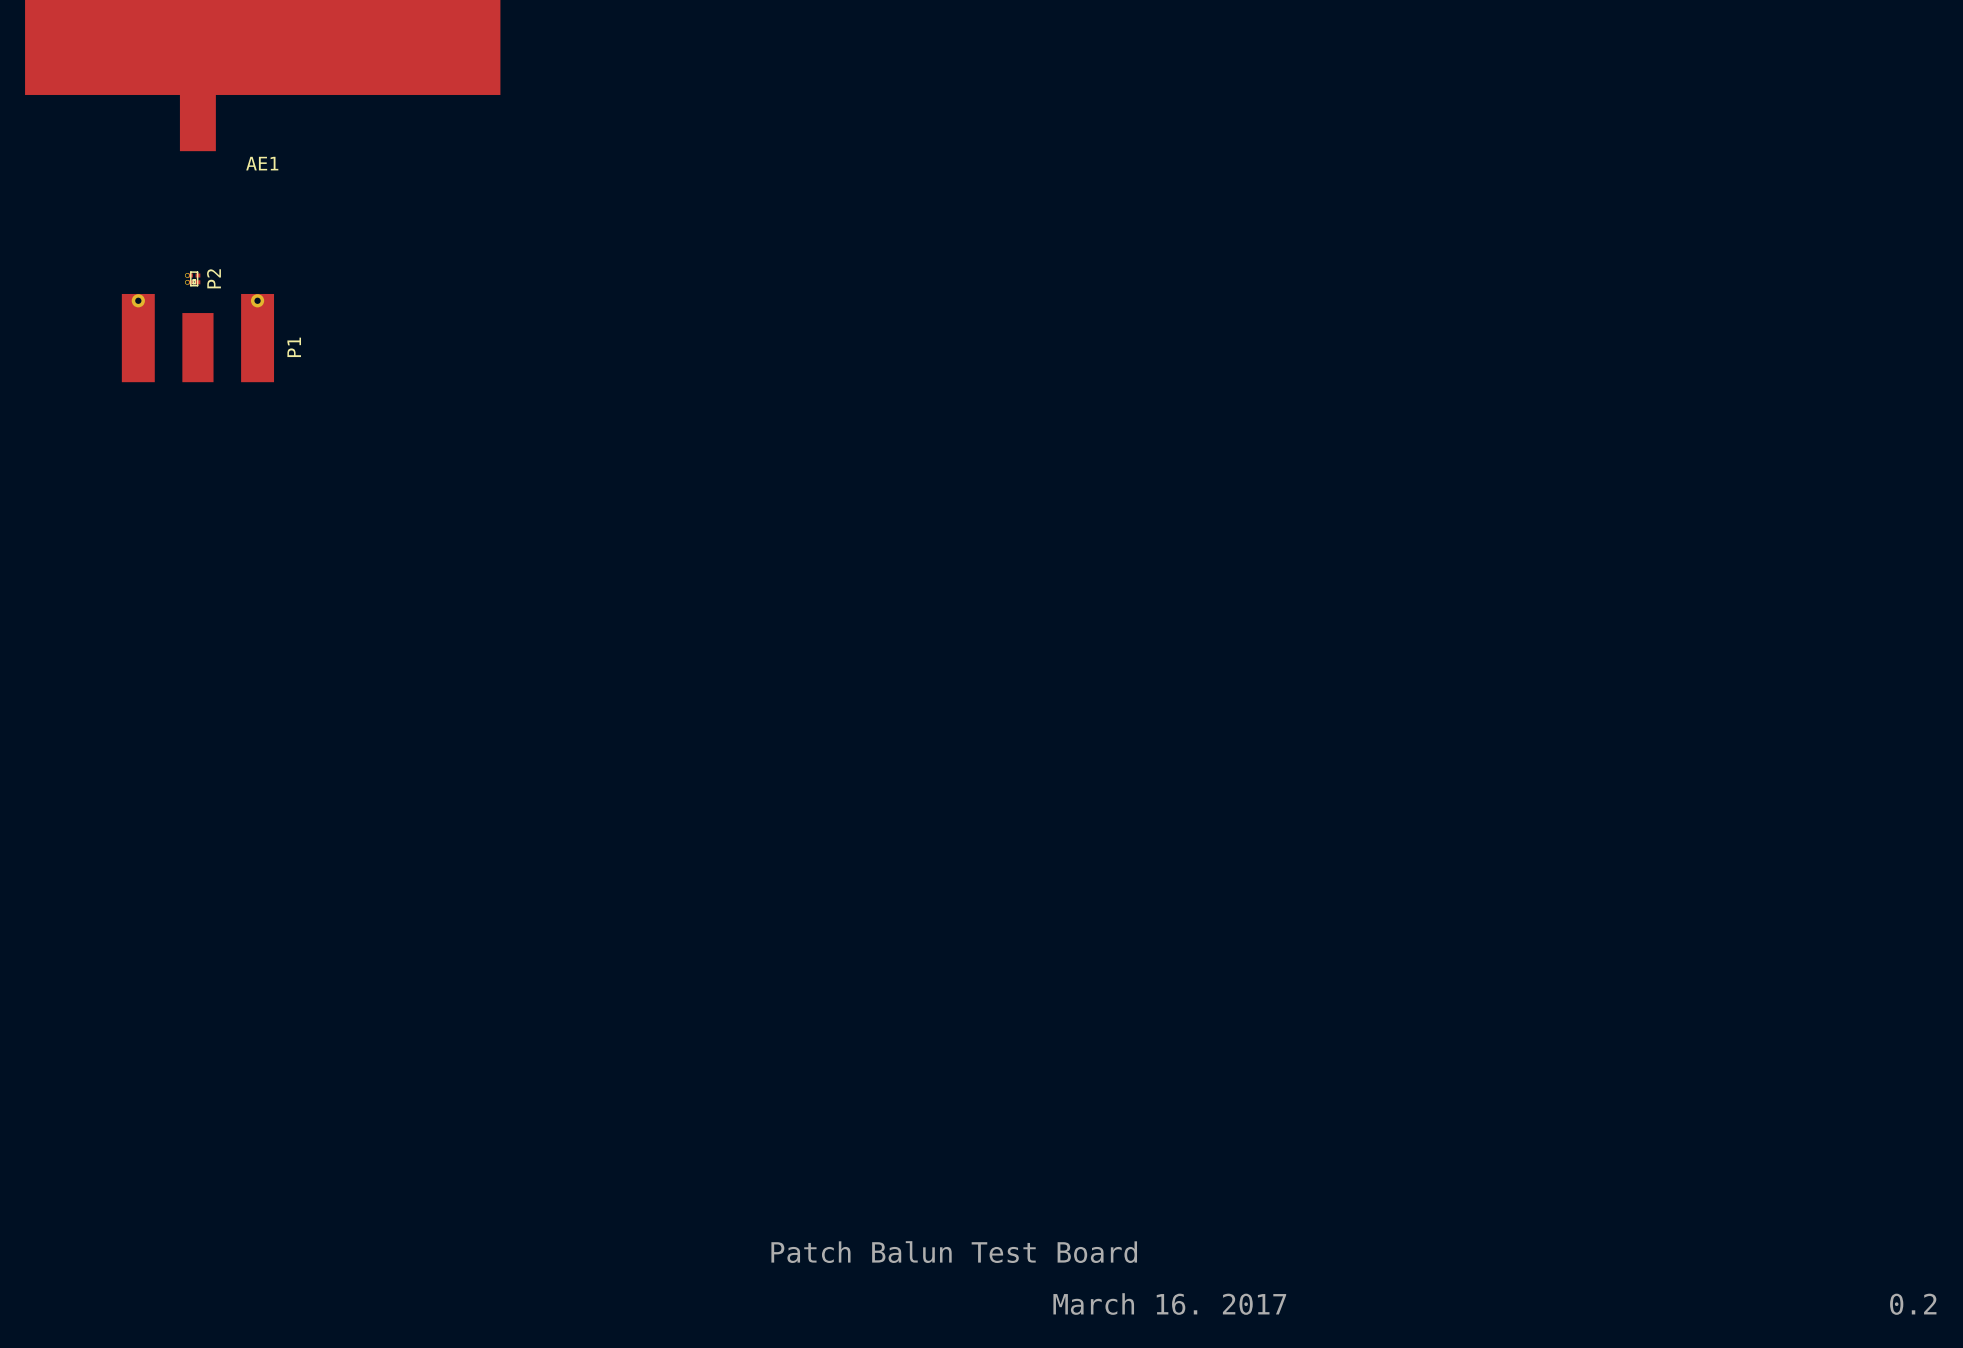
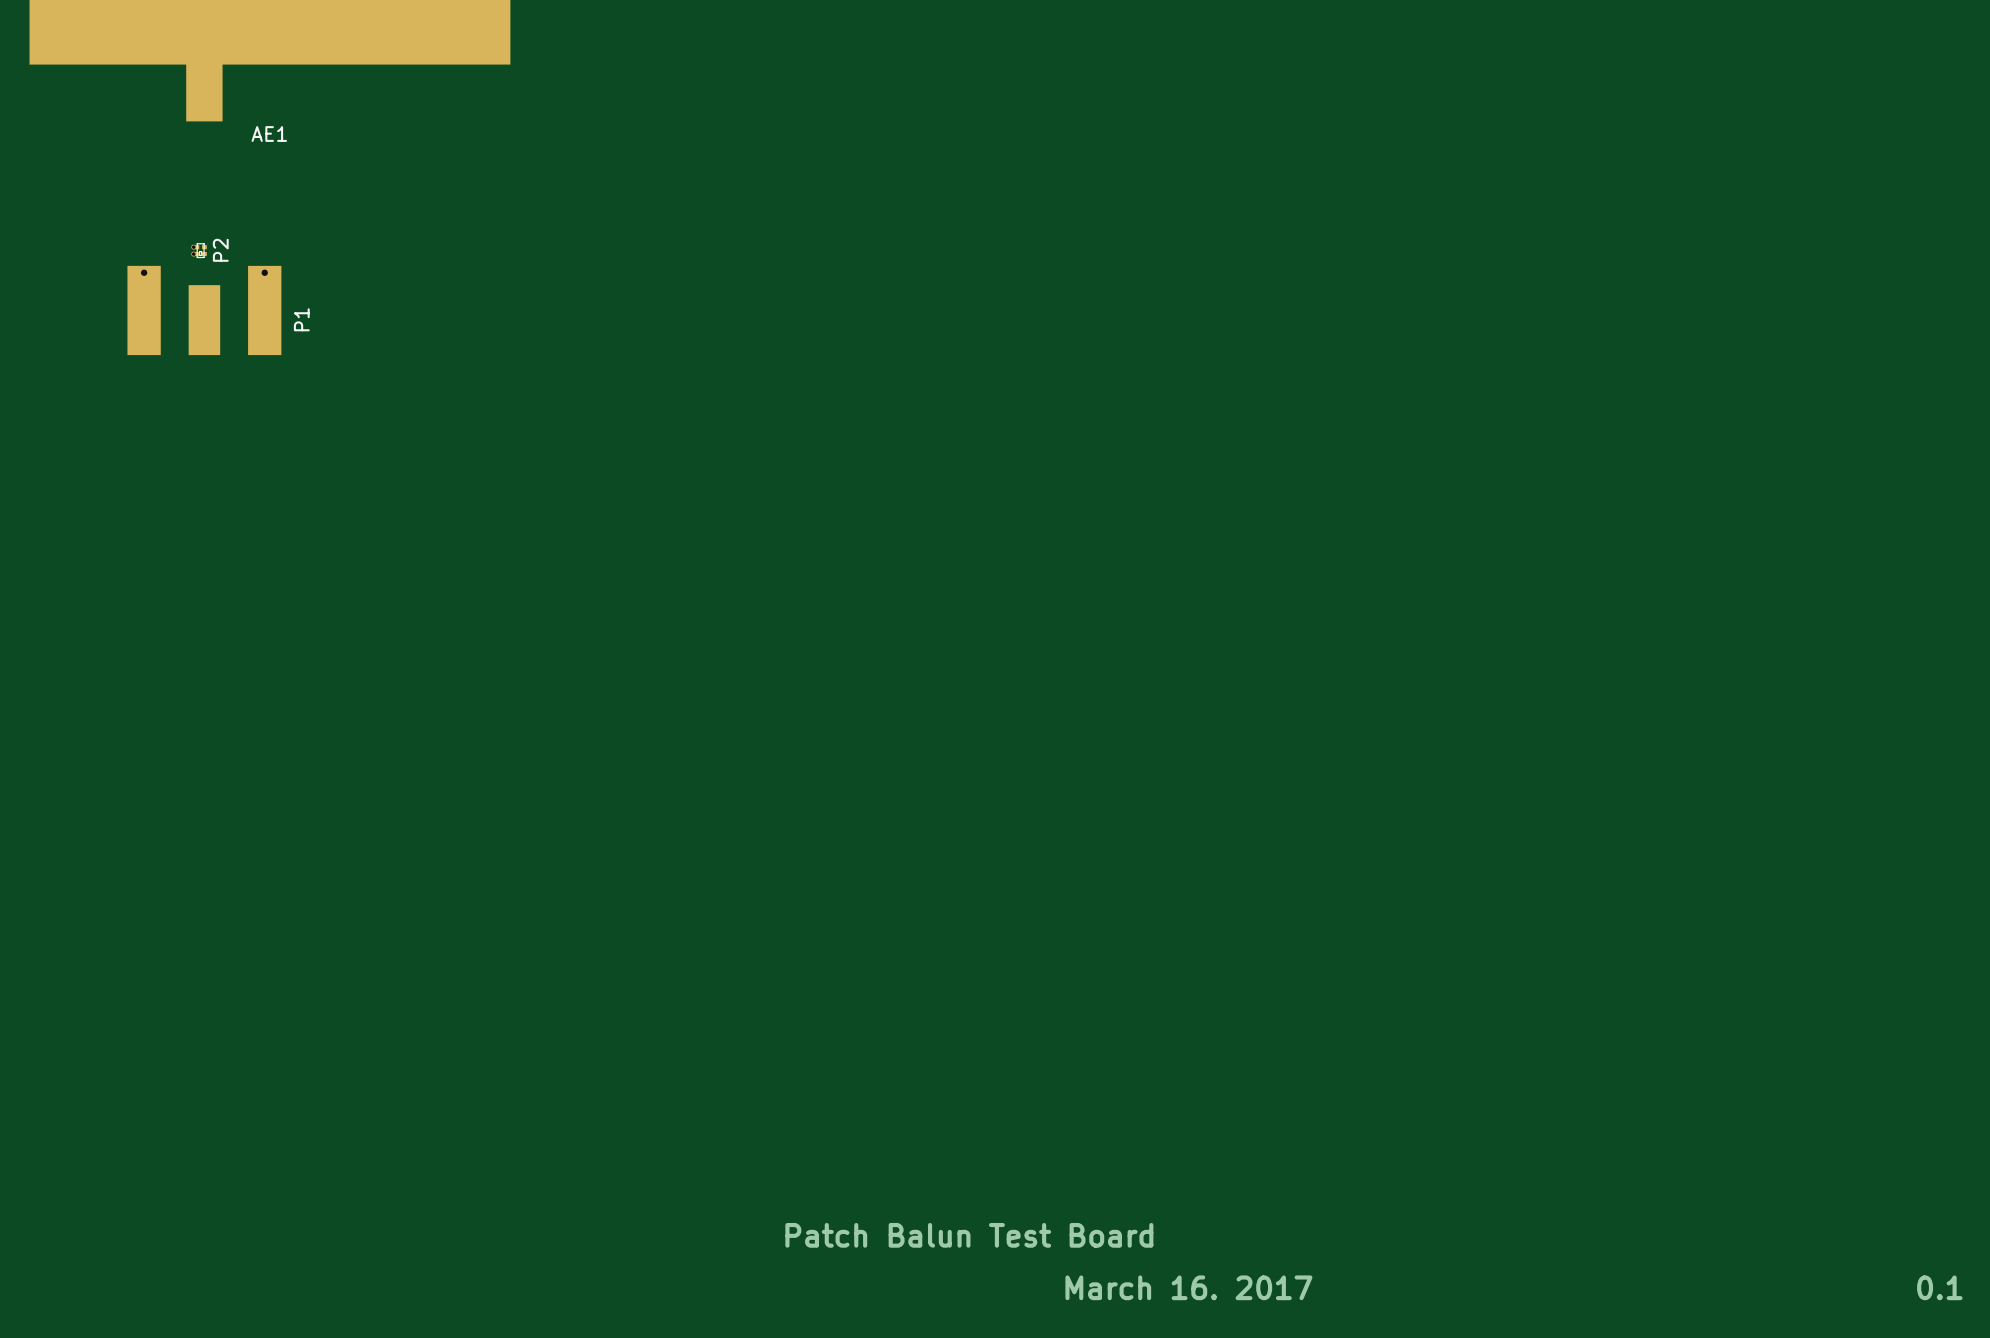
text: 0.2 (1913, 1304) -> 0.1 (1939, 1287)

